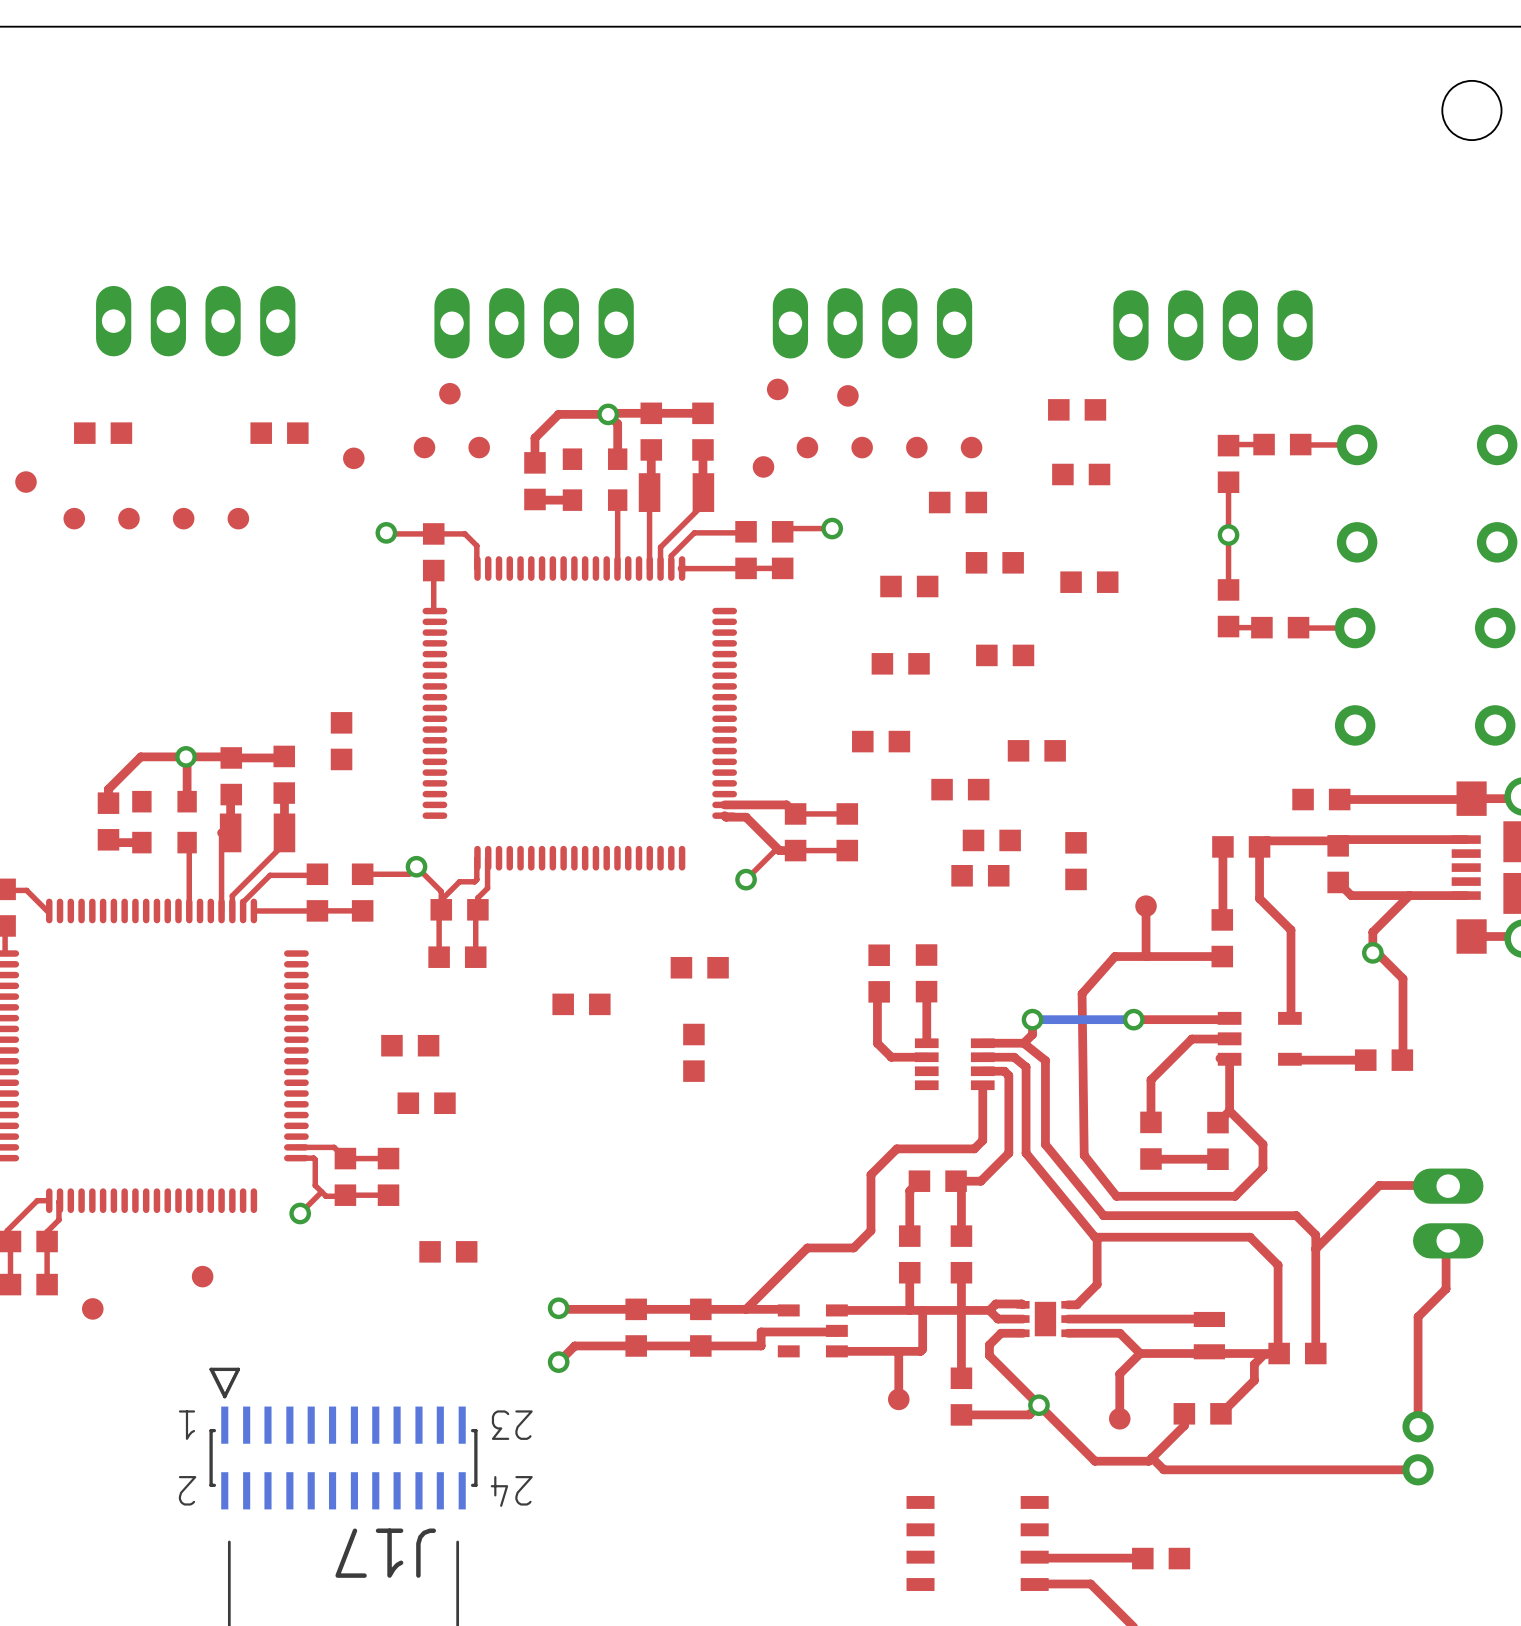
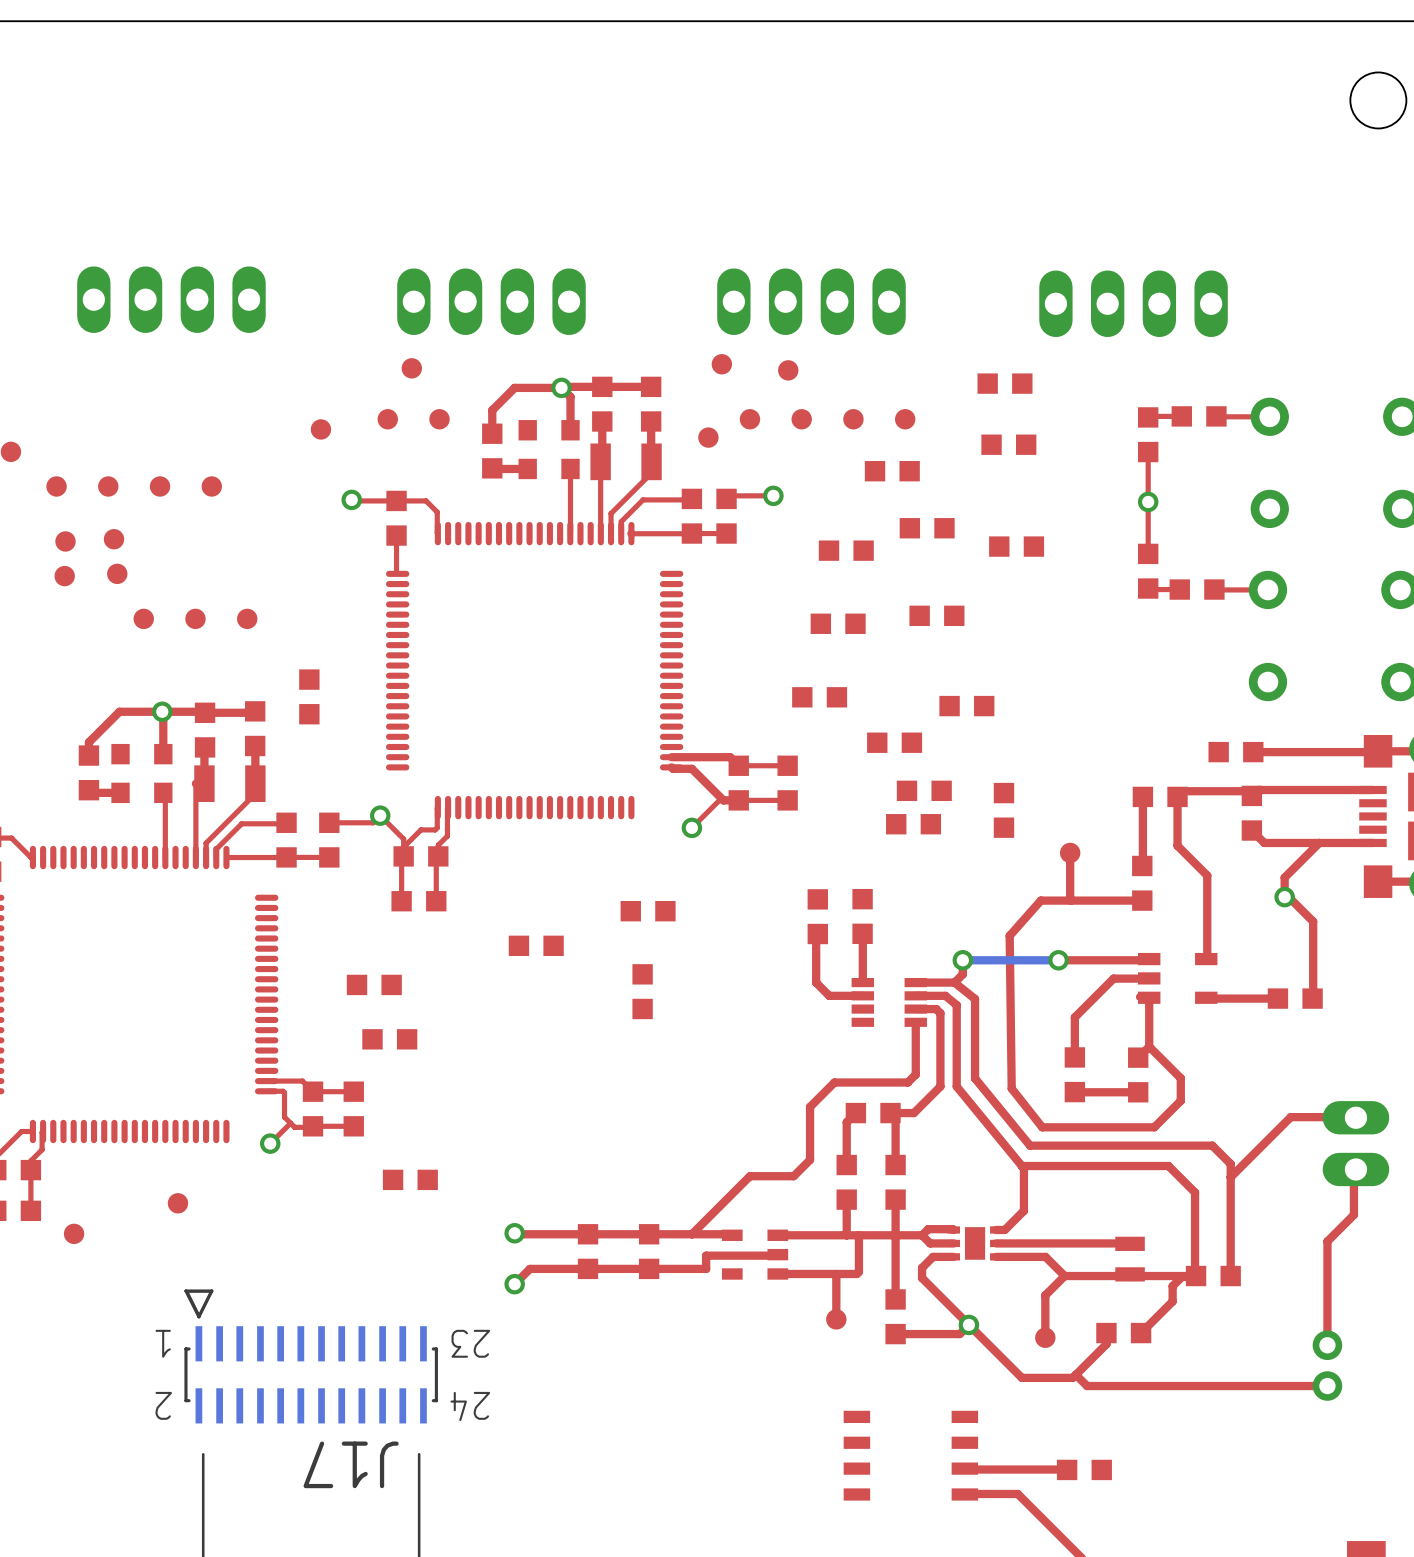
part: (103, 433) -> none
part: (279, 433) -> none
part: none -> (114, 539)
part: none -> (65, 541)
part: none -> (117, 573)
part: none -> (64, 576)
part: none -> (143, 618)
part: none -> (195, 618)
part: none -> (247, 618)

